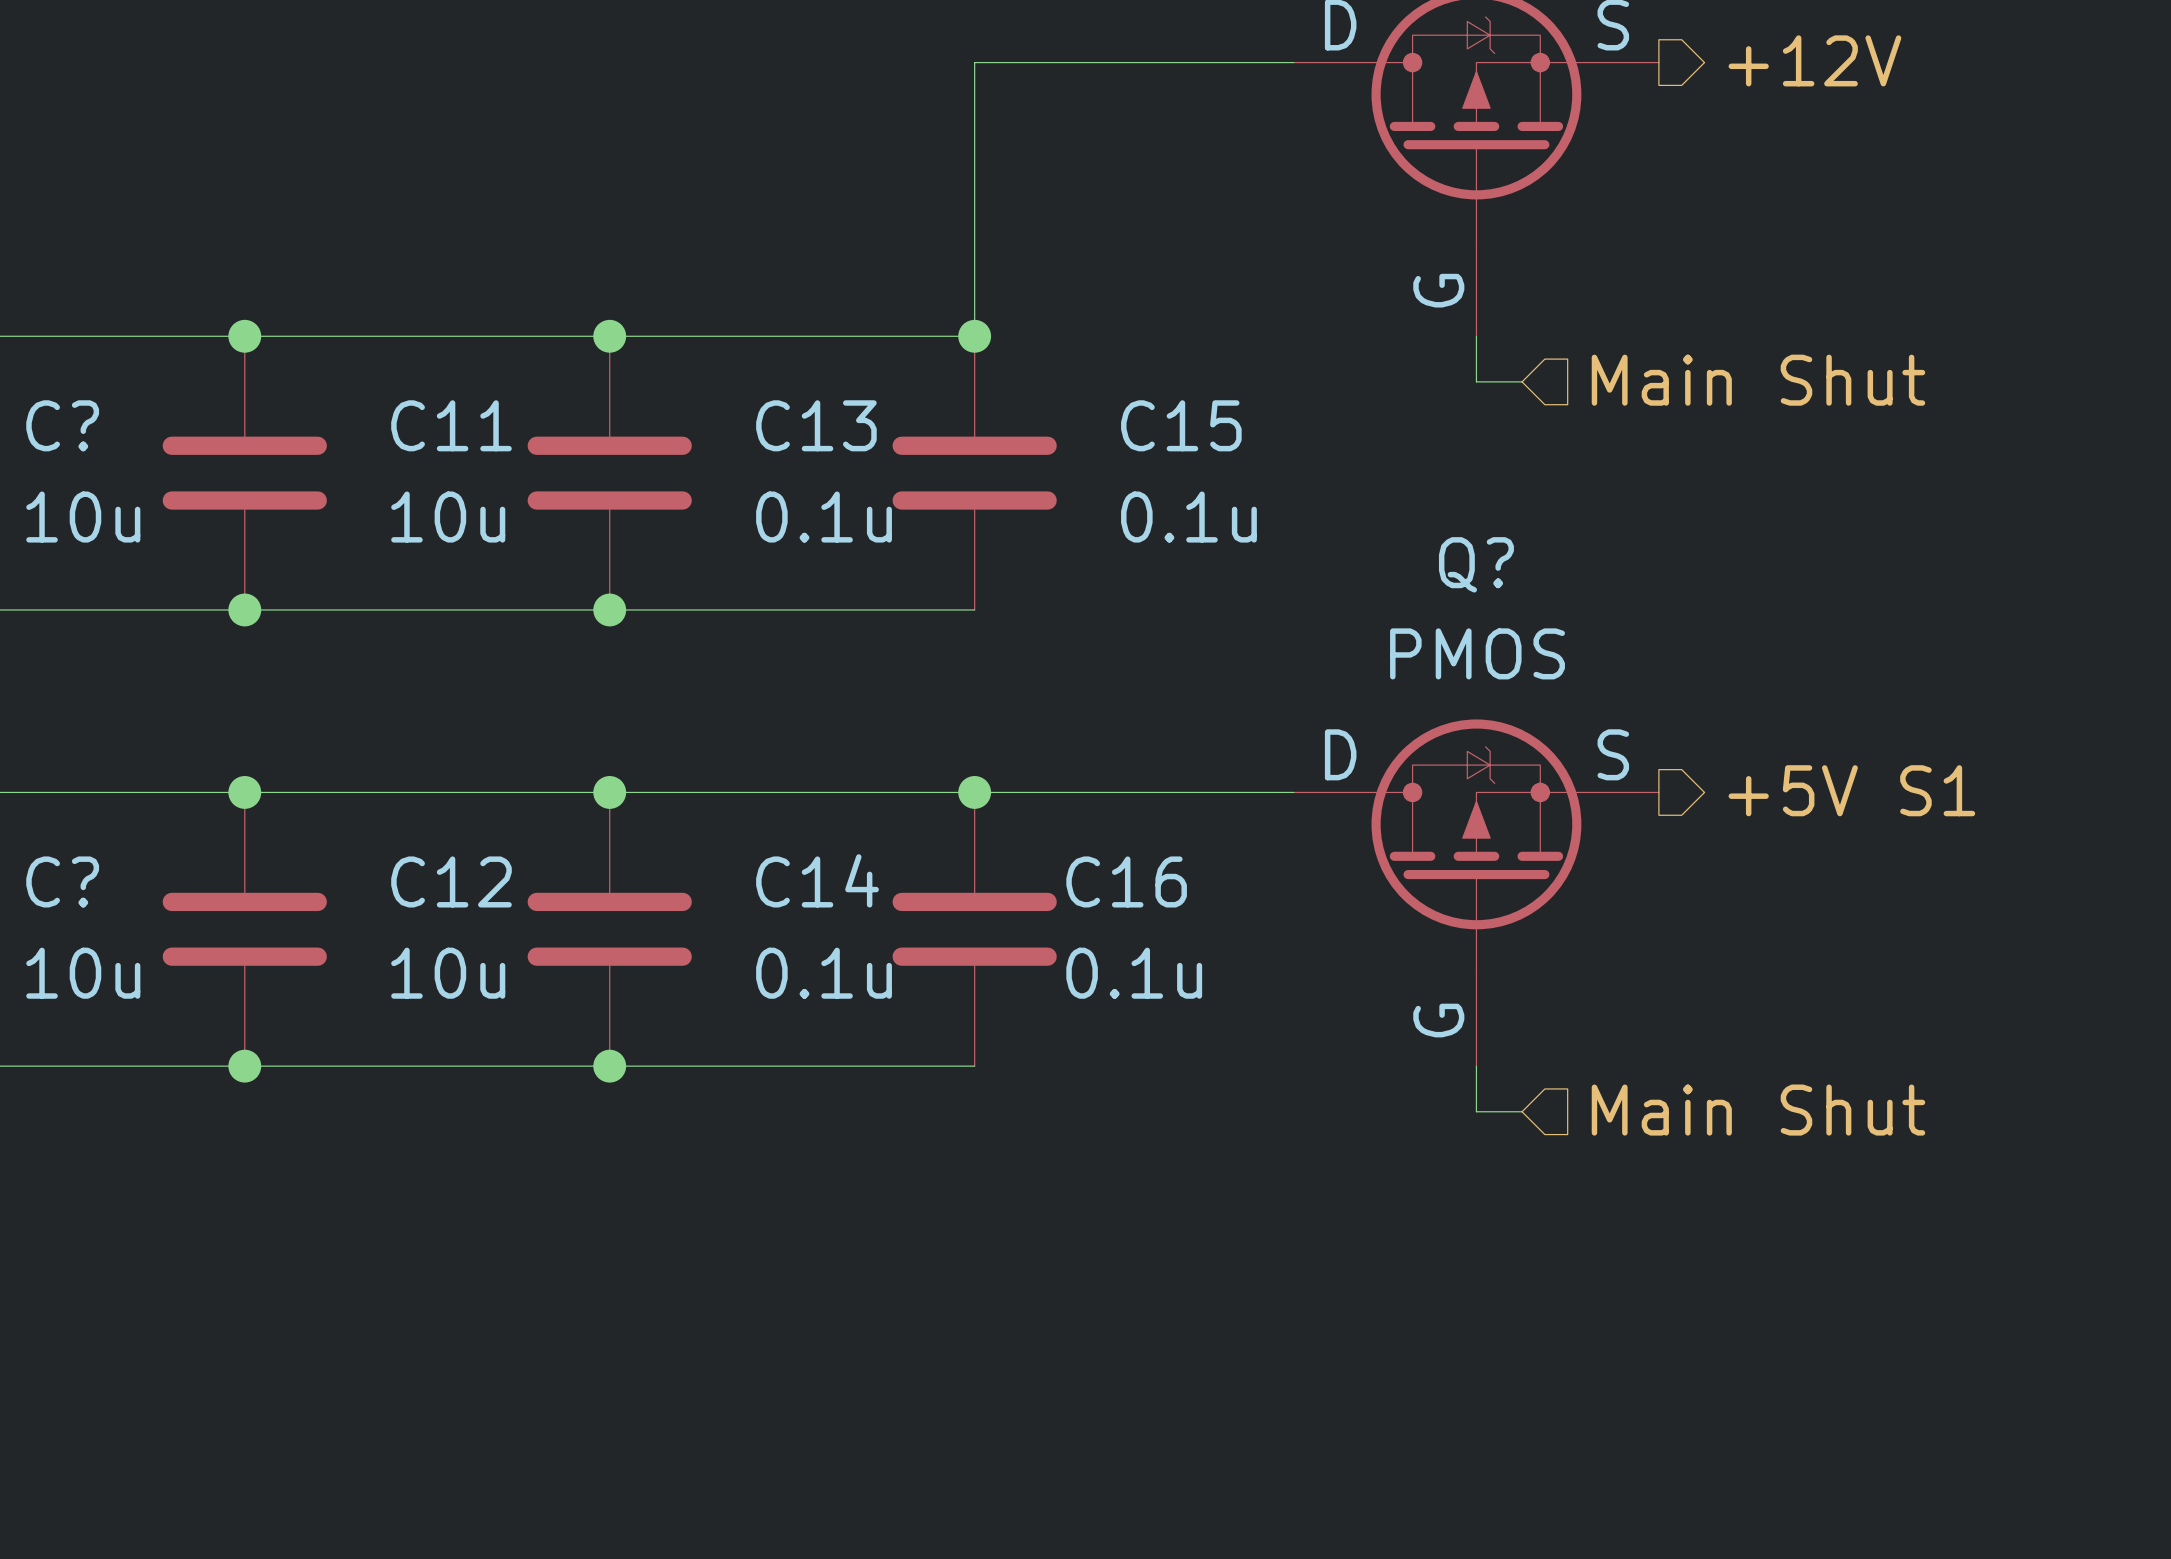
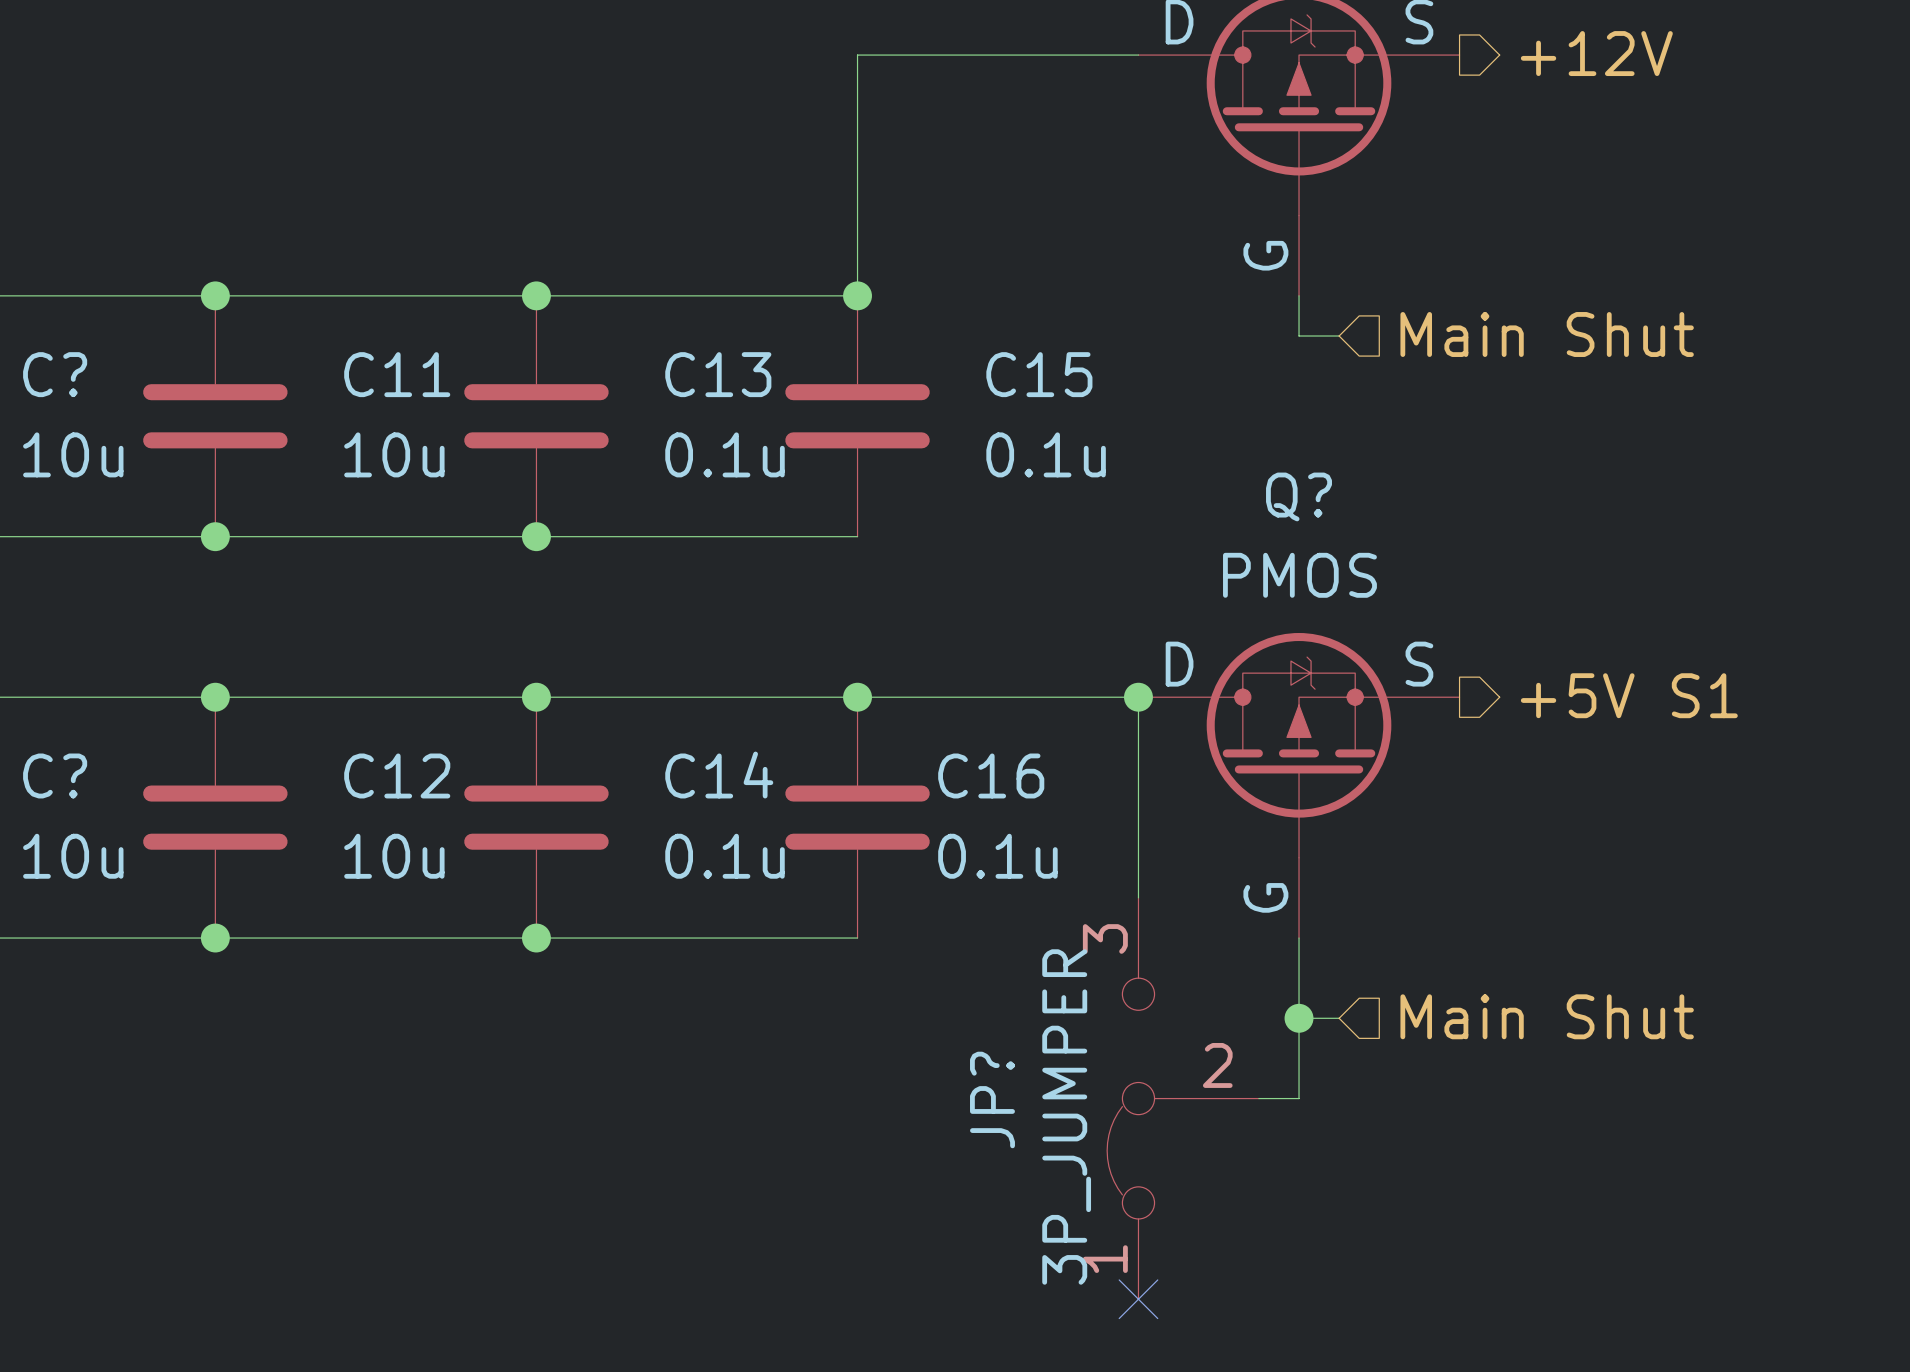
wire: none -> (1138, 697) (1138, 897)
junction: none -> (1138, 697)
hierarchical label position: Main Shut (1758, 1110) -> Main Shut (1547, 1016)
wire: (1476, 1111) (1522, 1111) -> (1299, 978) (1299, 1098) (1258, 1098)
wire: none -> (1299, 1018) (1339, 1018)
junction: none -> (1299, 1018)
JP?: none -> 3P_JUMPER (1183, 1098)
no-connect mark: none -> (1138, 1299)

